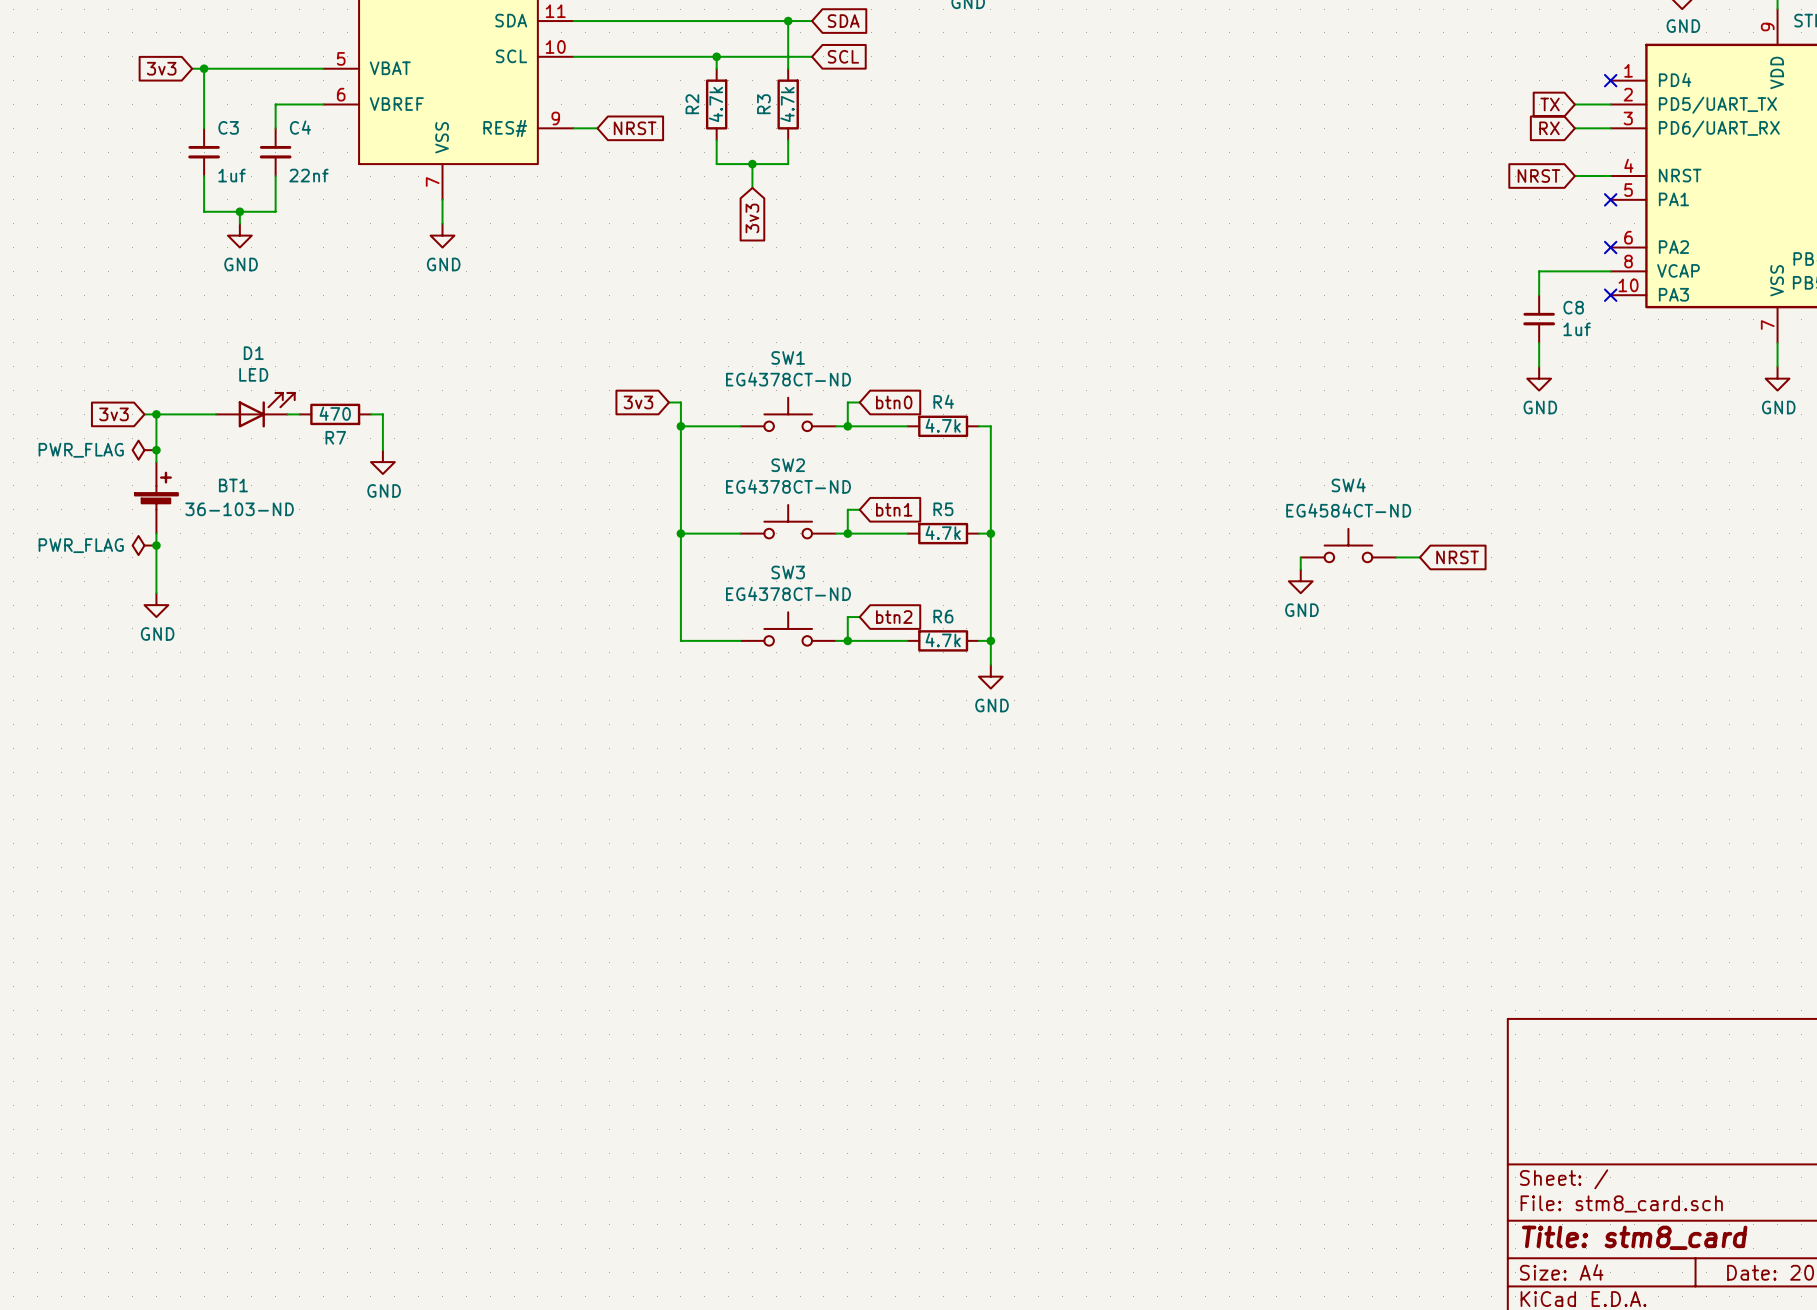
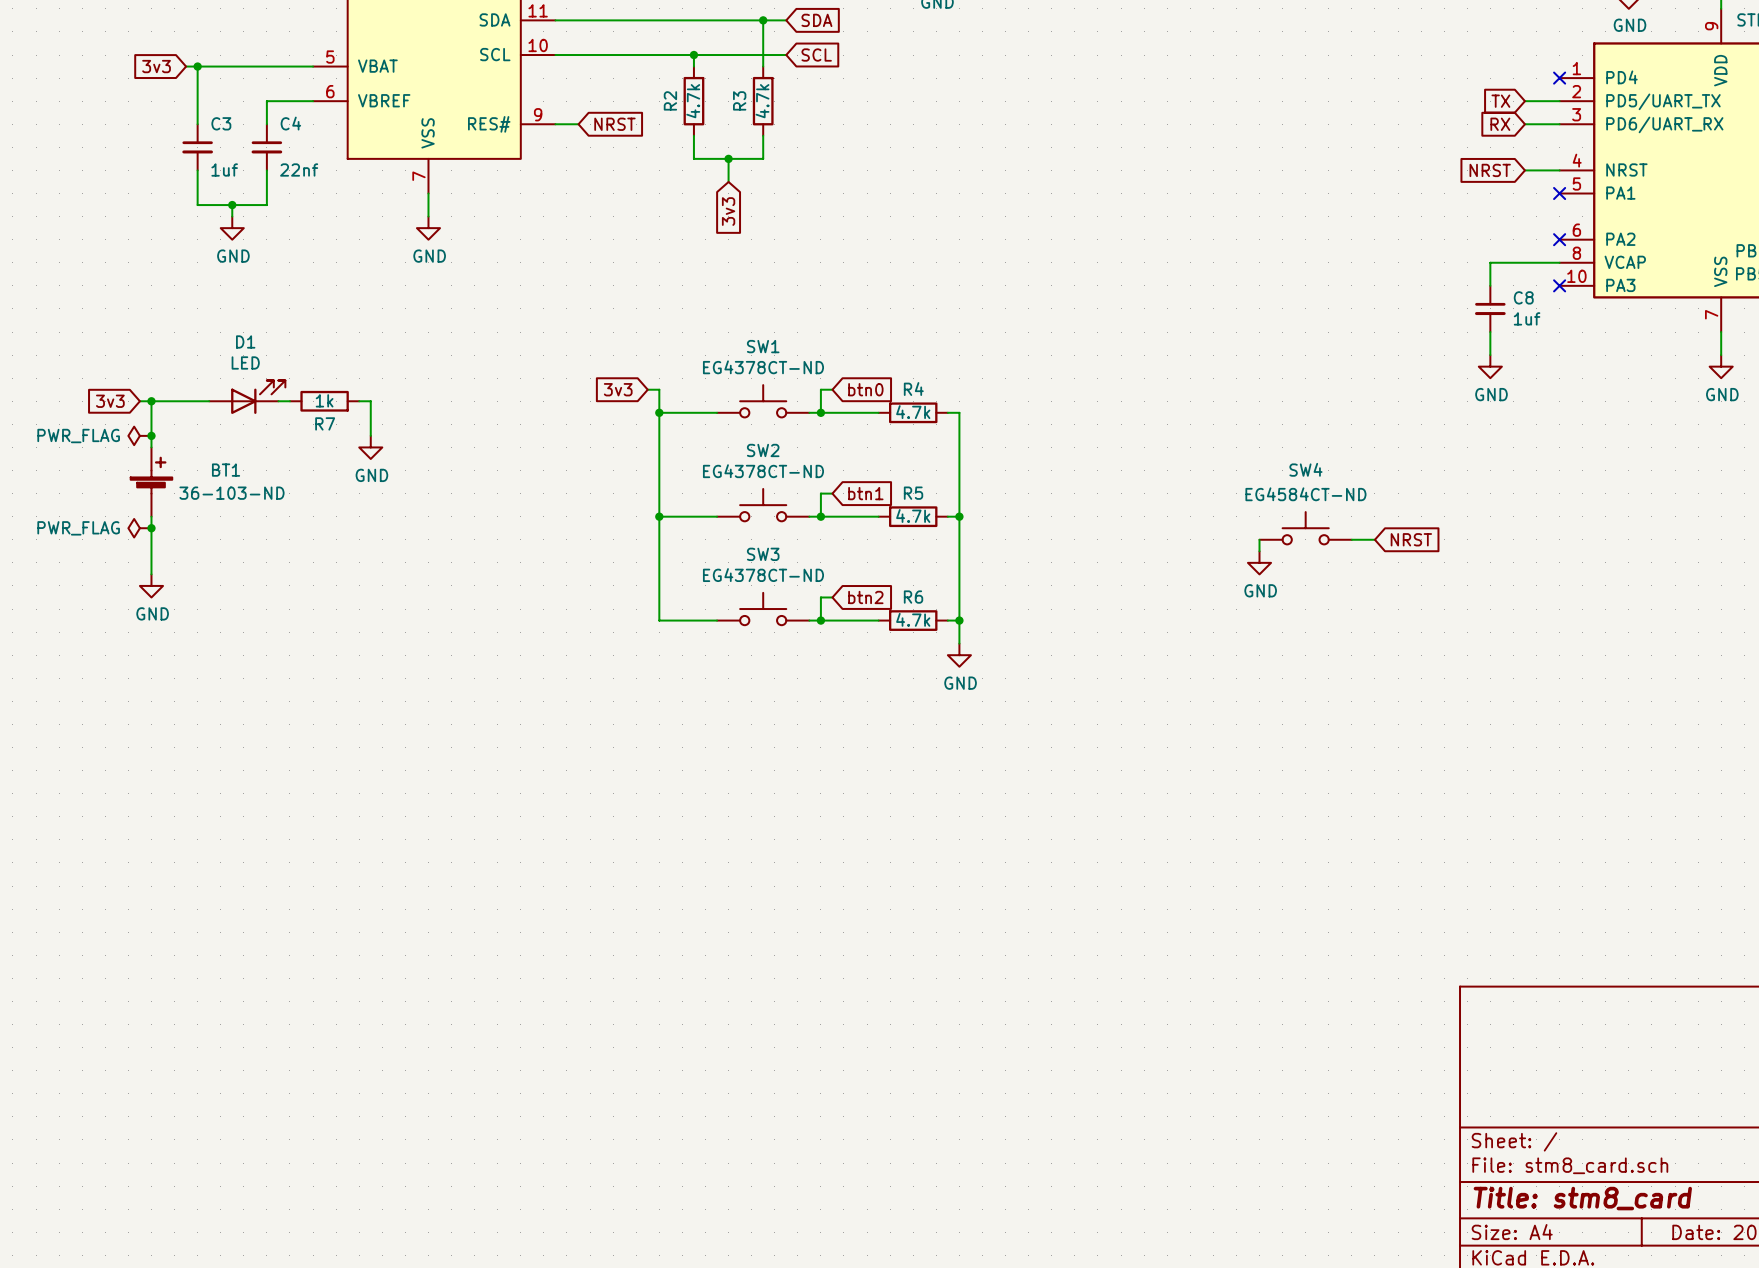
R7 value: 470 (335, 413) -> 1k (324, 400)

